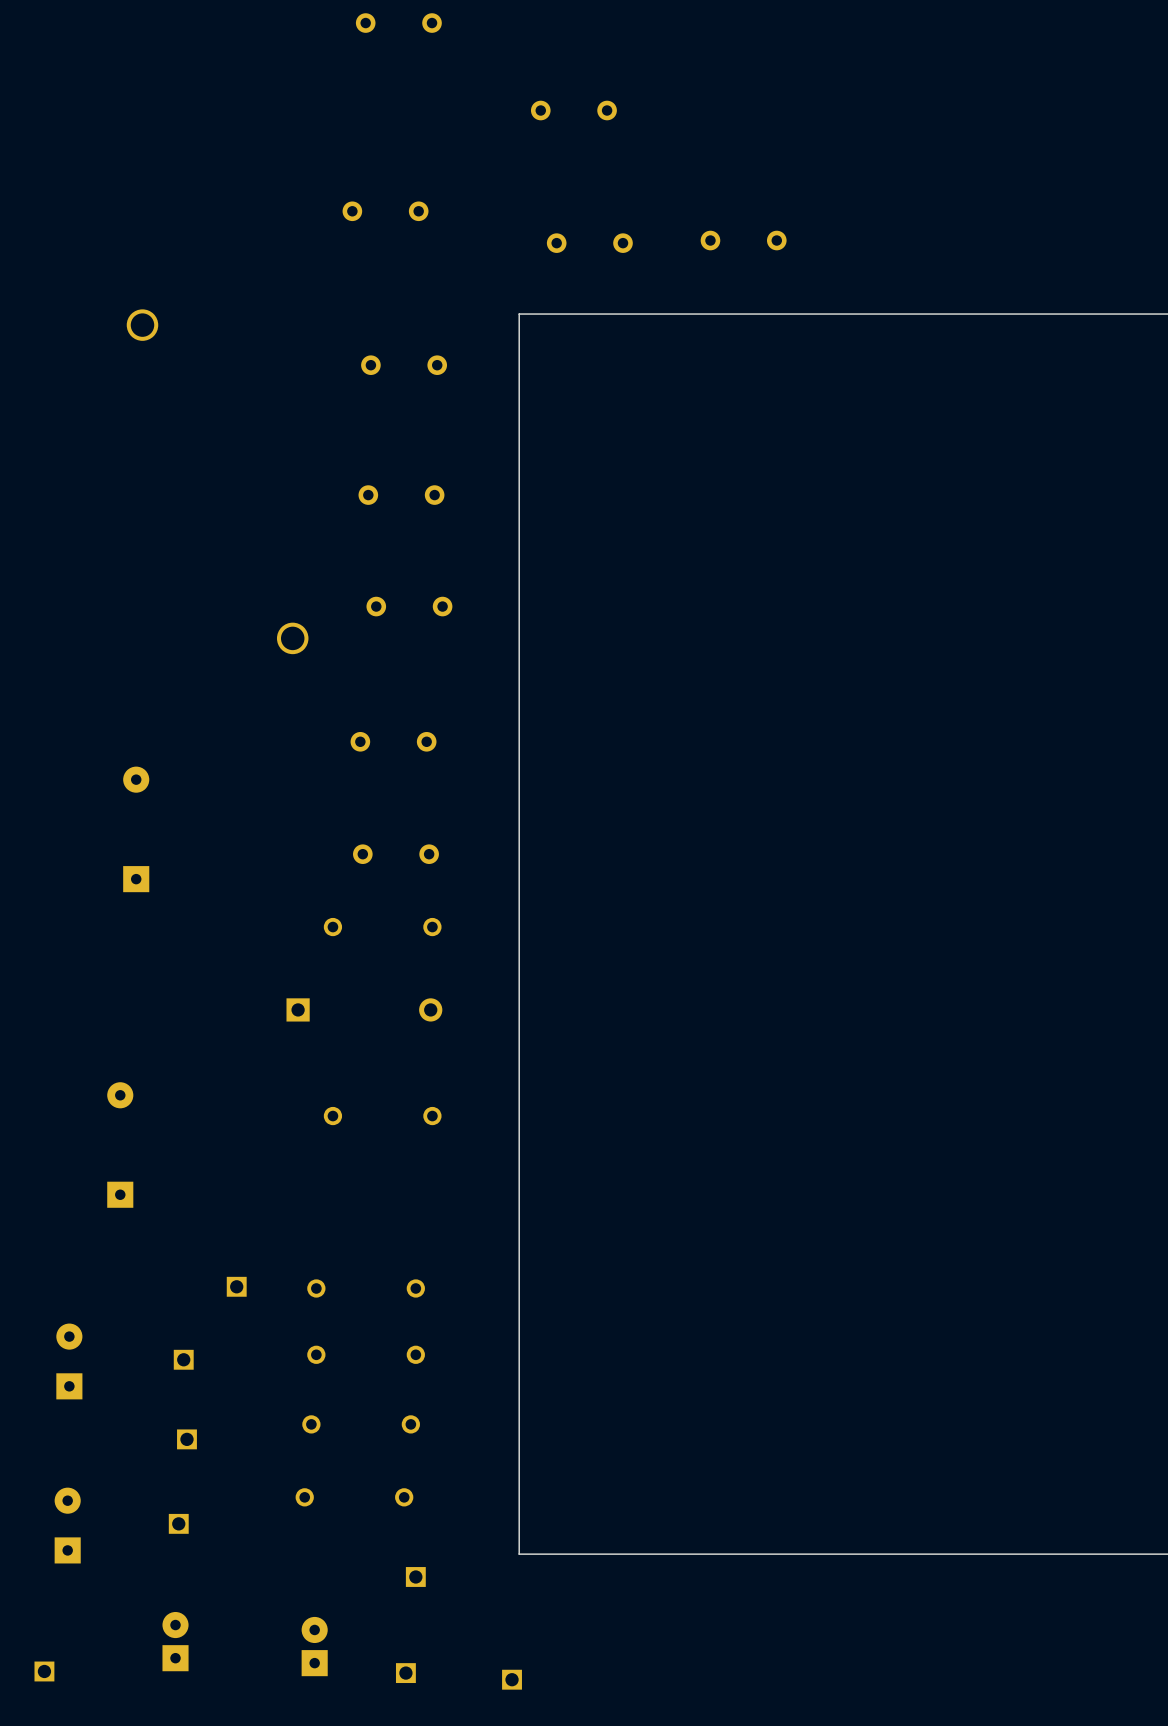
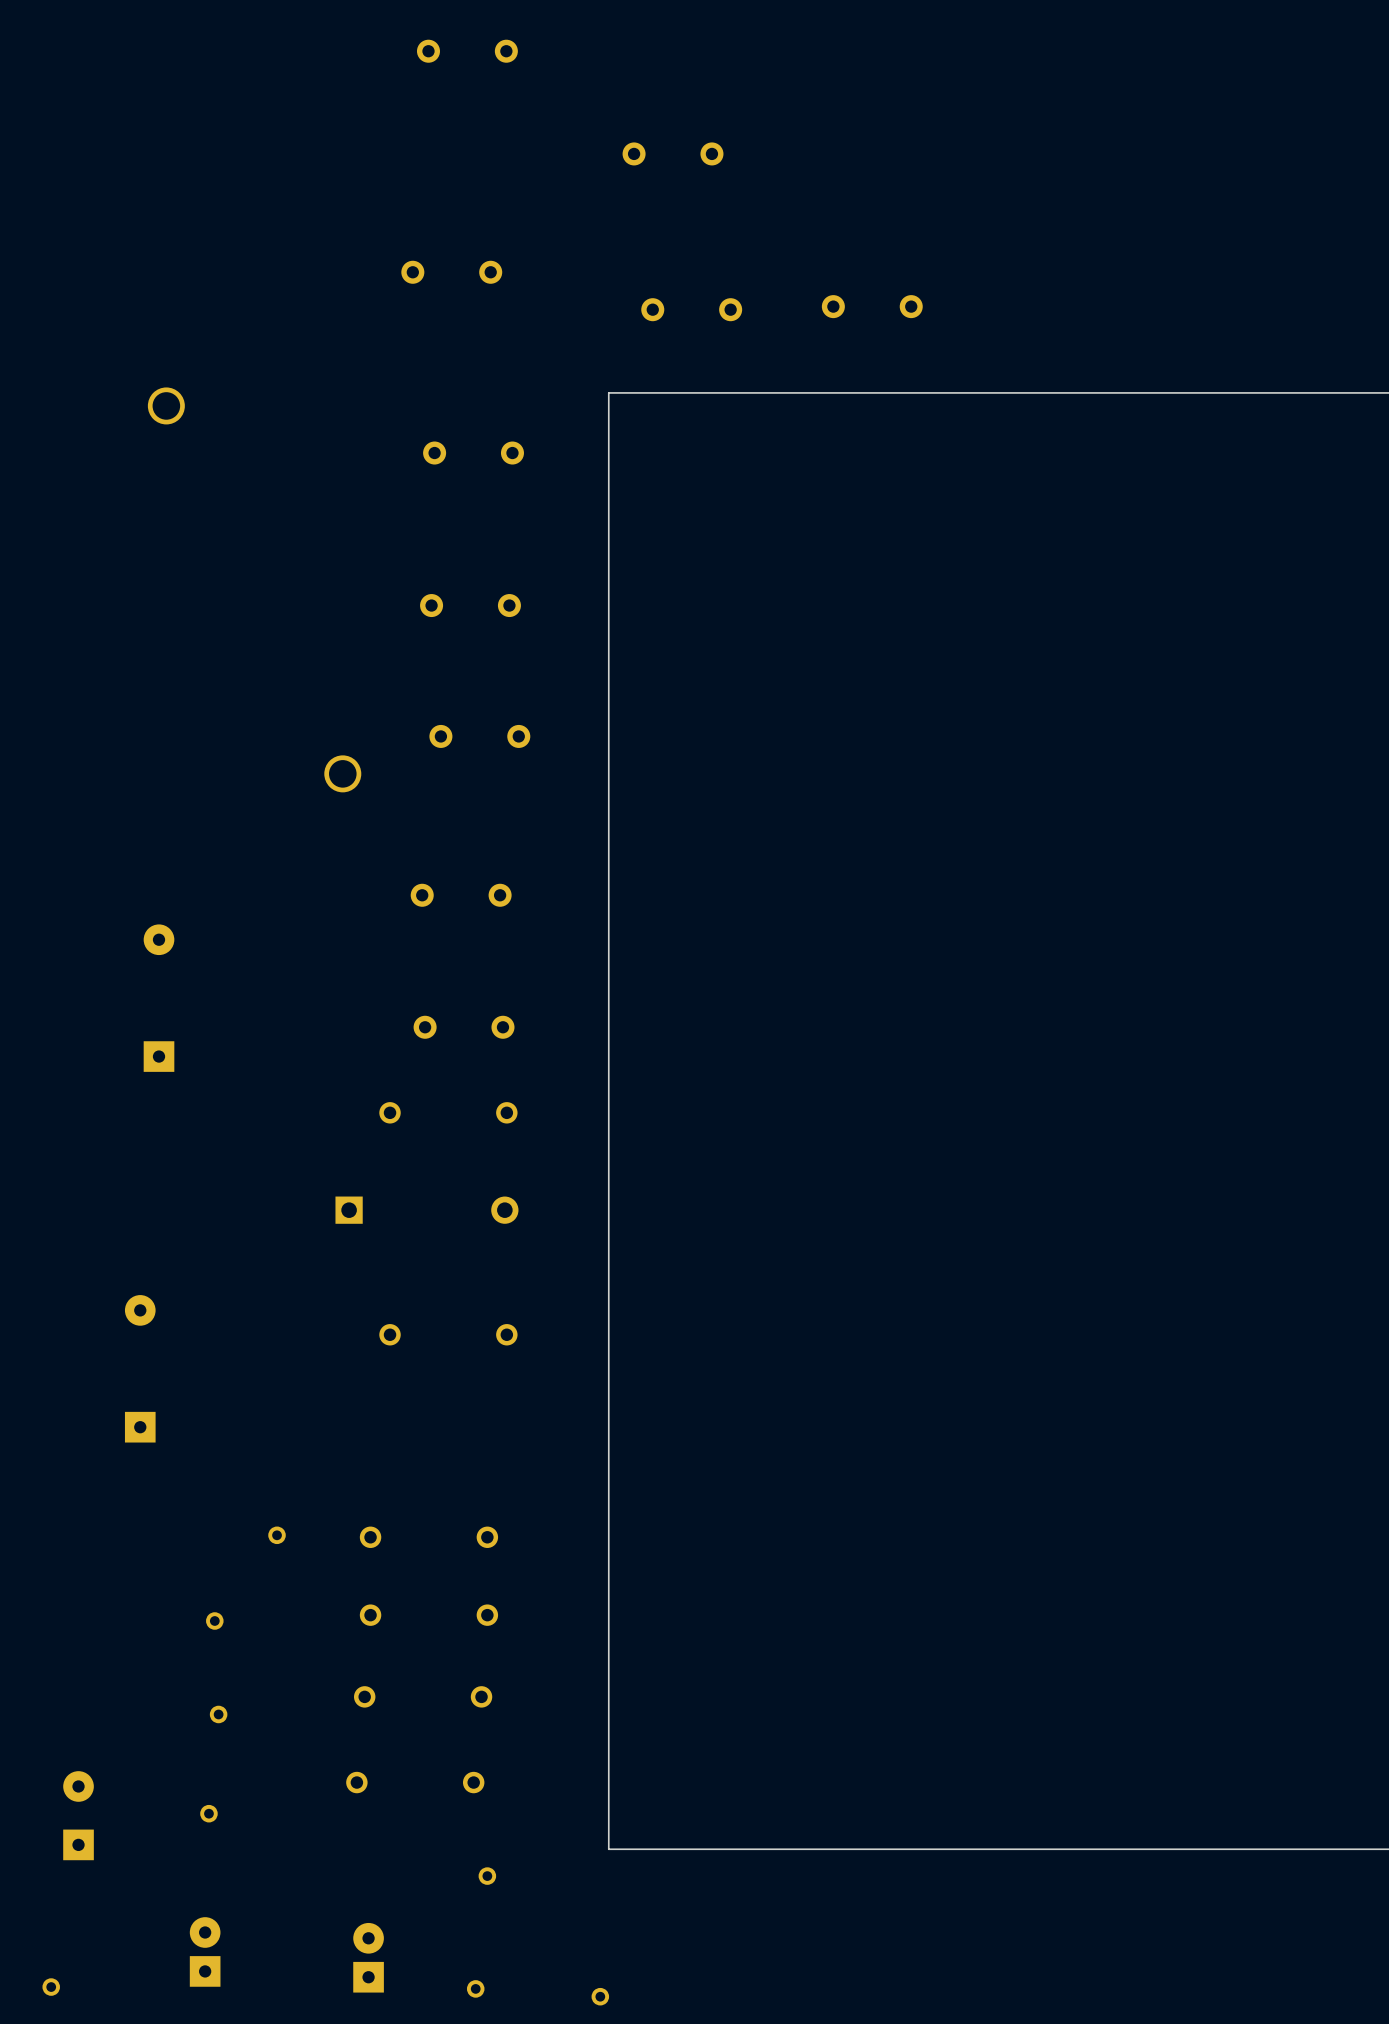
part footprint: [226, 1276, 247, 1297] -> [268, 1526, 286, 1545]
part footprint: [173, 1349, 194, 1370] -> [206, 1612, 224, 1630]
part: (69, 1361) -> none
part footprint: [177, 1429, 197, 1450] -> [209, 1705, 228, 1724]
part footprint: [168, 1513, 189, 1534] -> [200, 1804, 218, 1823]
part footprint: [405, 1567, 426, 1587] -> [478, 1867, 497, 1885]
part footprint: [34, 1661, 55, 1682] -> [42, 1978, 60, 1996]
part footprint: [395, 1663, 416, 1684] -> [466, 1980, 485, 1998]
part footprint: [502, 1669, 522, 1690] -> [591, 1987, 610, 2006]

